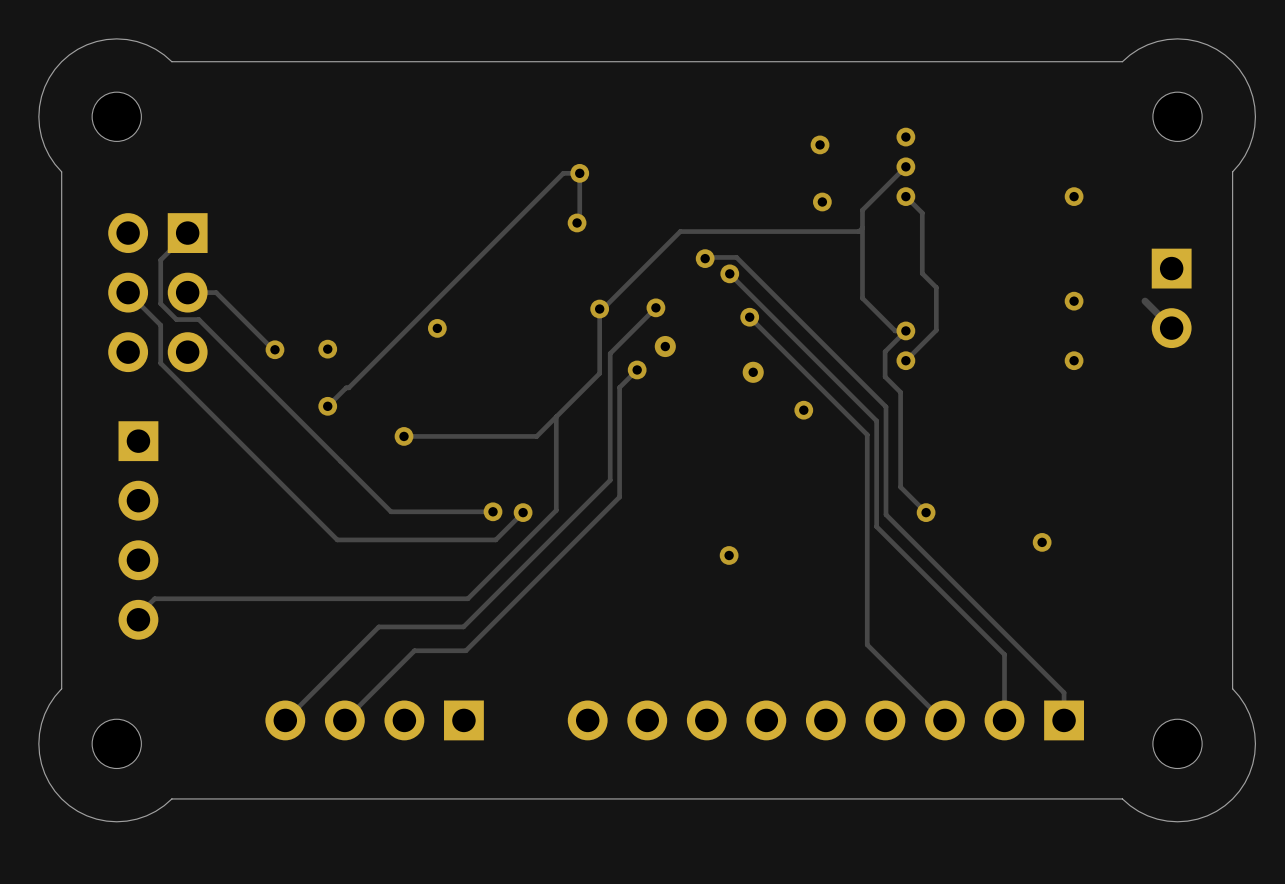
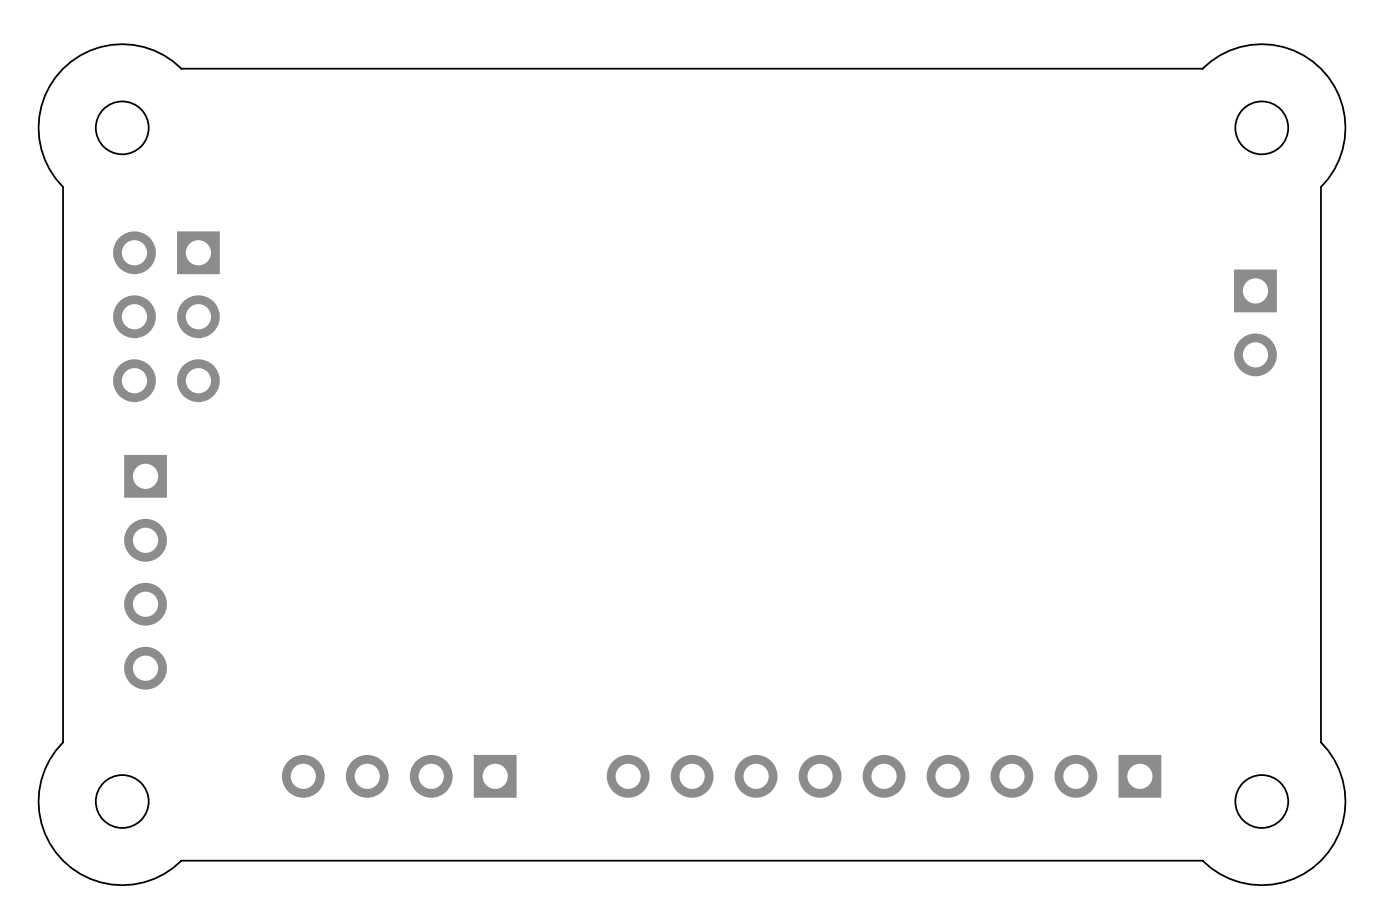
via: (905, 137) -> none
via: (820, 144) -> none
track: (905, 166) (862, 210) (862, 298) (895, 330) (905, 330) (885, 351) (885, 376) (900, 392) (900, 487) (926, 512) -> none
via: (905, 166) -> none
via: (579, 173) -> none
track: (905, 196) (922, 213) (922, 273) (936, 287) (936, 330) (905, 360) -> none
via: (905, 196) -> none
via: (1074, 196) -> none
via: (822, 202) -> none
track: (577, 222) (579, 220) (579, 173) (563, 173) (348, 387) (346, 387) (327, 406) -> none
via: (577, 222) -> none
track: (862, 228) (859, 231) (680, 231) (602, 309) (599, 309) (599, 373) (536, 436) (404, 436) -> none
track: (187, 233) (160, 260) (160, 303) (176, 319) (198, 319) (391, 511) (493, 511) -> none
track: (705, 258) (736, 257) (886, 406) (886, 514) (1064, 692) (1064, 722) -> none
via: (705, 258) -> none
via: (729, 273) -> none
track: (729, 274) (876, 420) (876, 526) (1004, 654) (1004, 722) -> none
track: (128, 292) (160, 325) (160, 363) (337, 539) (495, 539) (523, 512) -> none
track: (187, 292) (216, 292) (274, 349) -> none
via: (1074, 301) -> none
track: (1145, 301) (1171, 327) -> none
track: (655, 307) (610, 353) (610, 480) (463, 626) (378, 626) (285, 720) -> none
via: (655, 307) -> none
via: (599, 309) -> none
track: (749, 317) (867, 434) (867, 644) (944, 722) -> none
via: (749, 317) -> none
via: (437, 328) -> none
via: (905, 330) -> none
via: (665, 346) -> none
via: (274, 349) -> none
via: (327, 349) -> none
via: (905, 360) -> none
via: (1074, 360) -> none
track: (637, 369) (619, 387) (619, 497) (465, 650) (414, 650) (344, 720) -> none
via: (637, 369) -> none
via: (753, 372) -> none
via: (327, 406) -> none
via: (803, 410) -> none
track: (556, 416) (556, 510) (467, 598) (154, 598) (138, 615) (138, 619) -> none
via: (404, 436) -> none
via: (493, 511) -> none
via: (523, 512) -> none
via: (926, 512) -> none
via: (1042, 542) -> none
via: (729, 555) -> none

